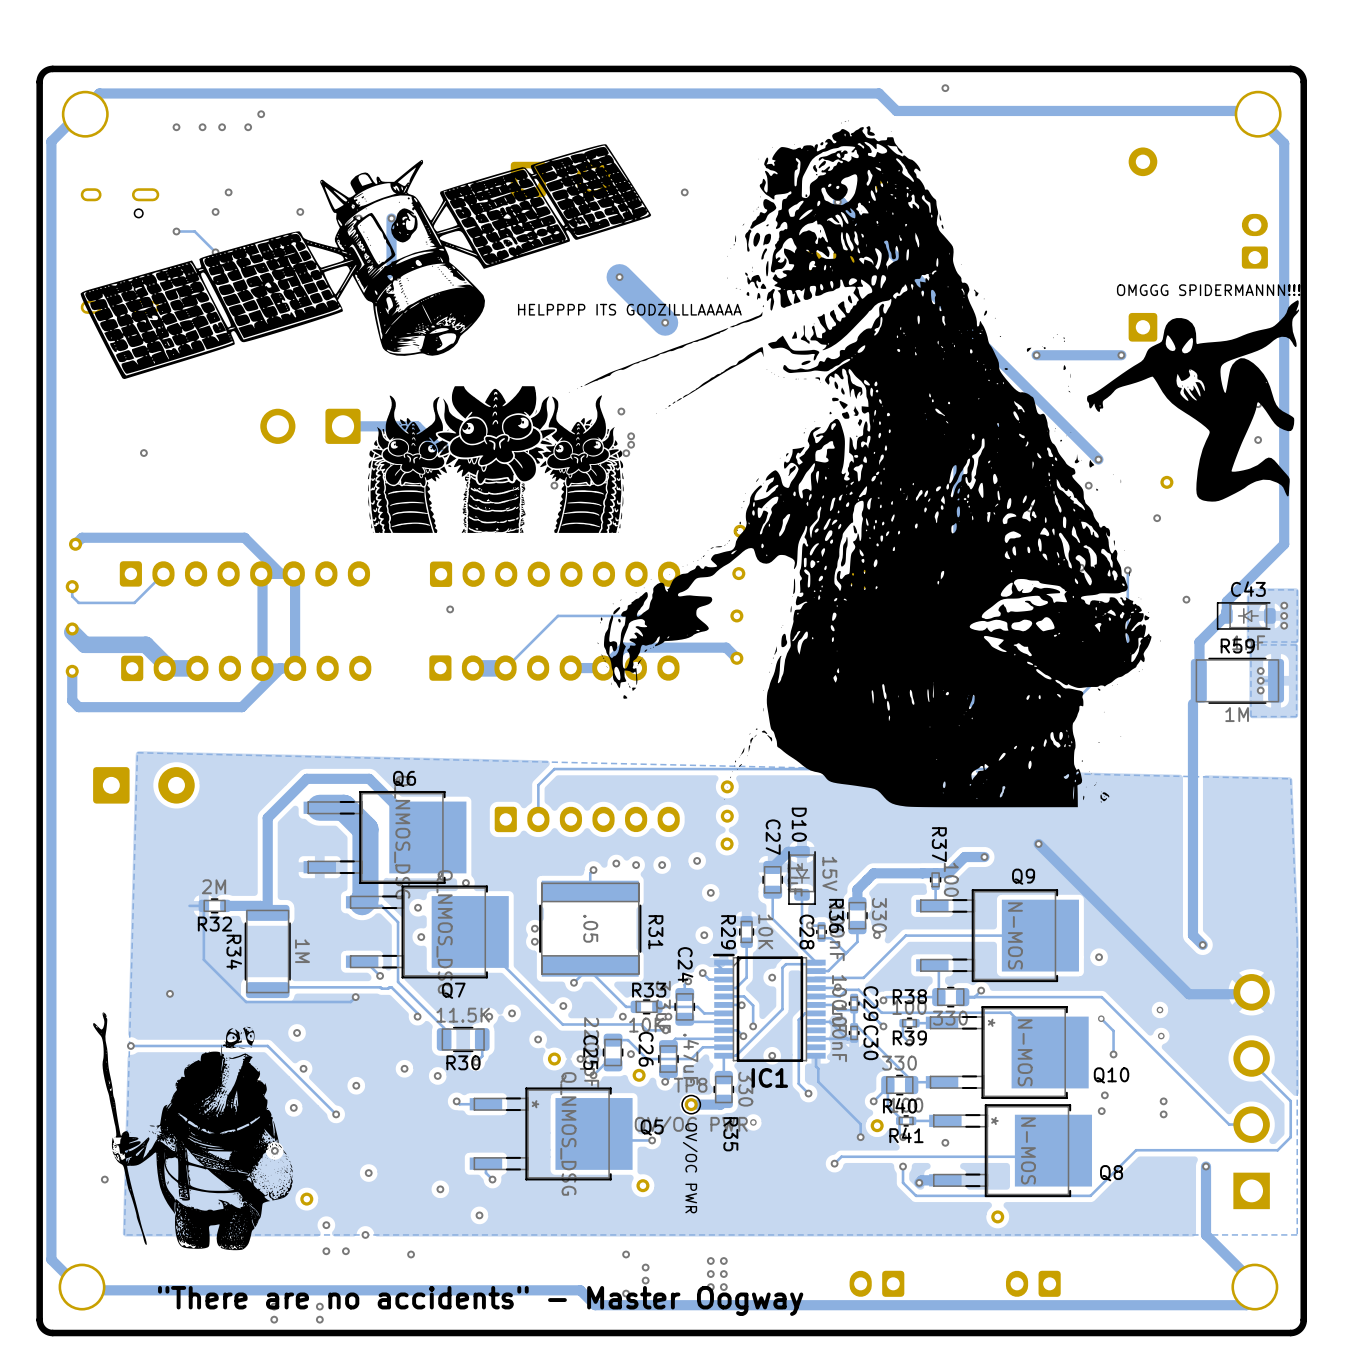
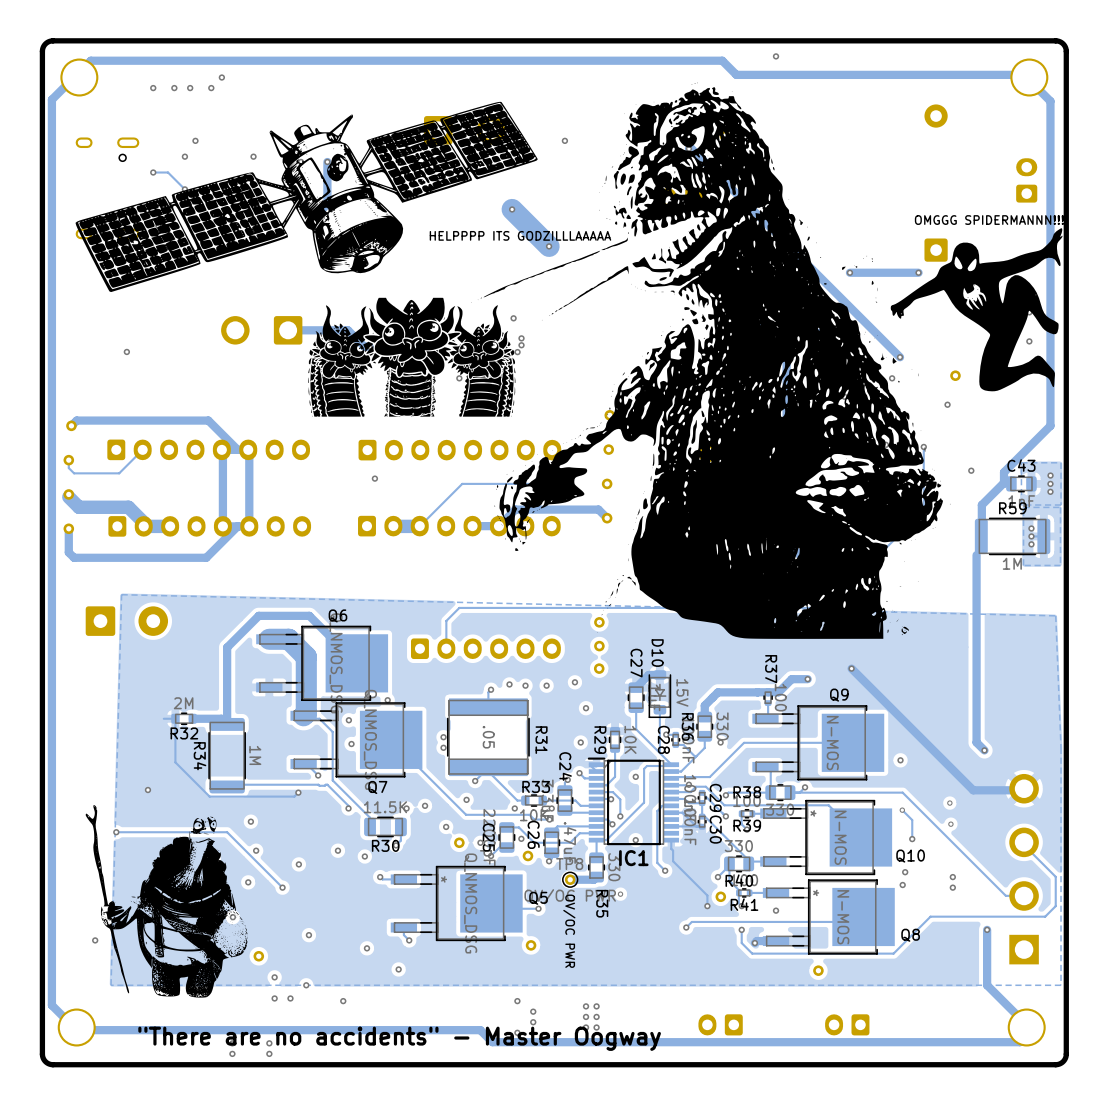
C43 footprint: [1216, 602, 1276, 630] -> [1006, 475, 1037, 493]

